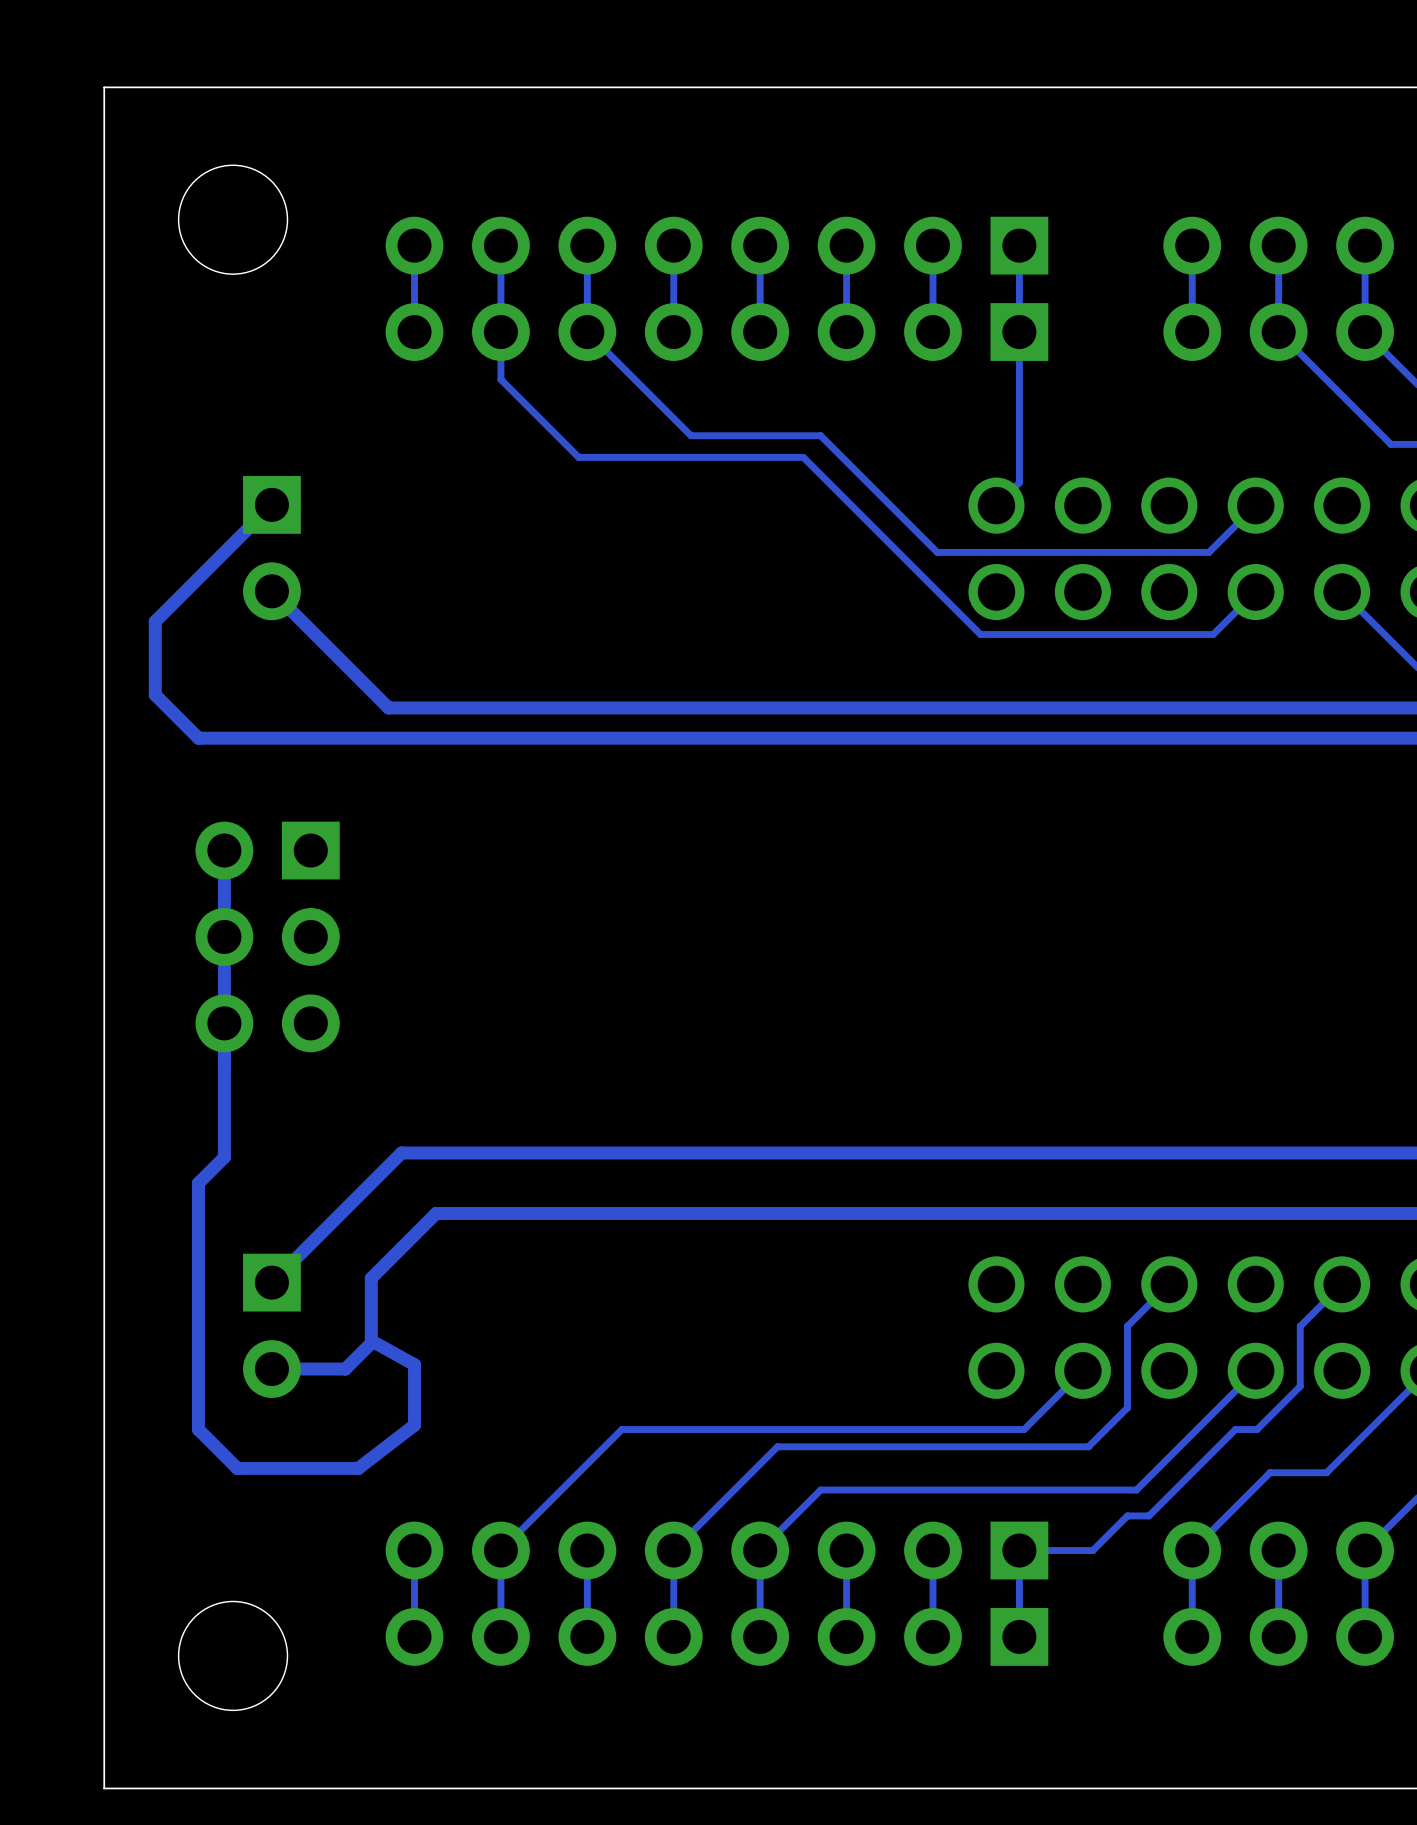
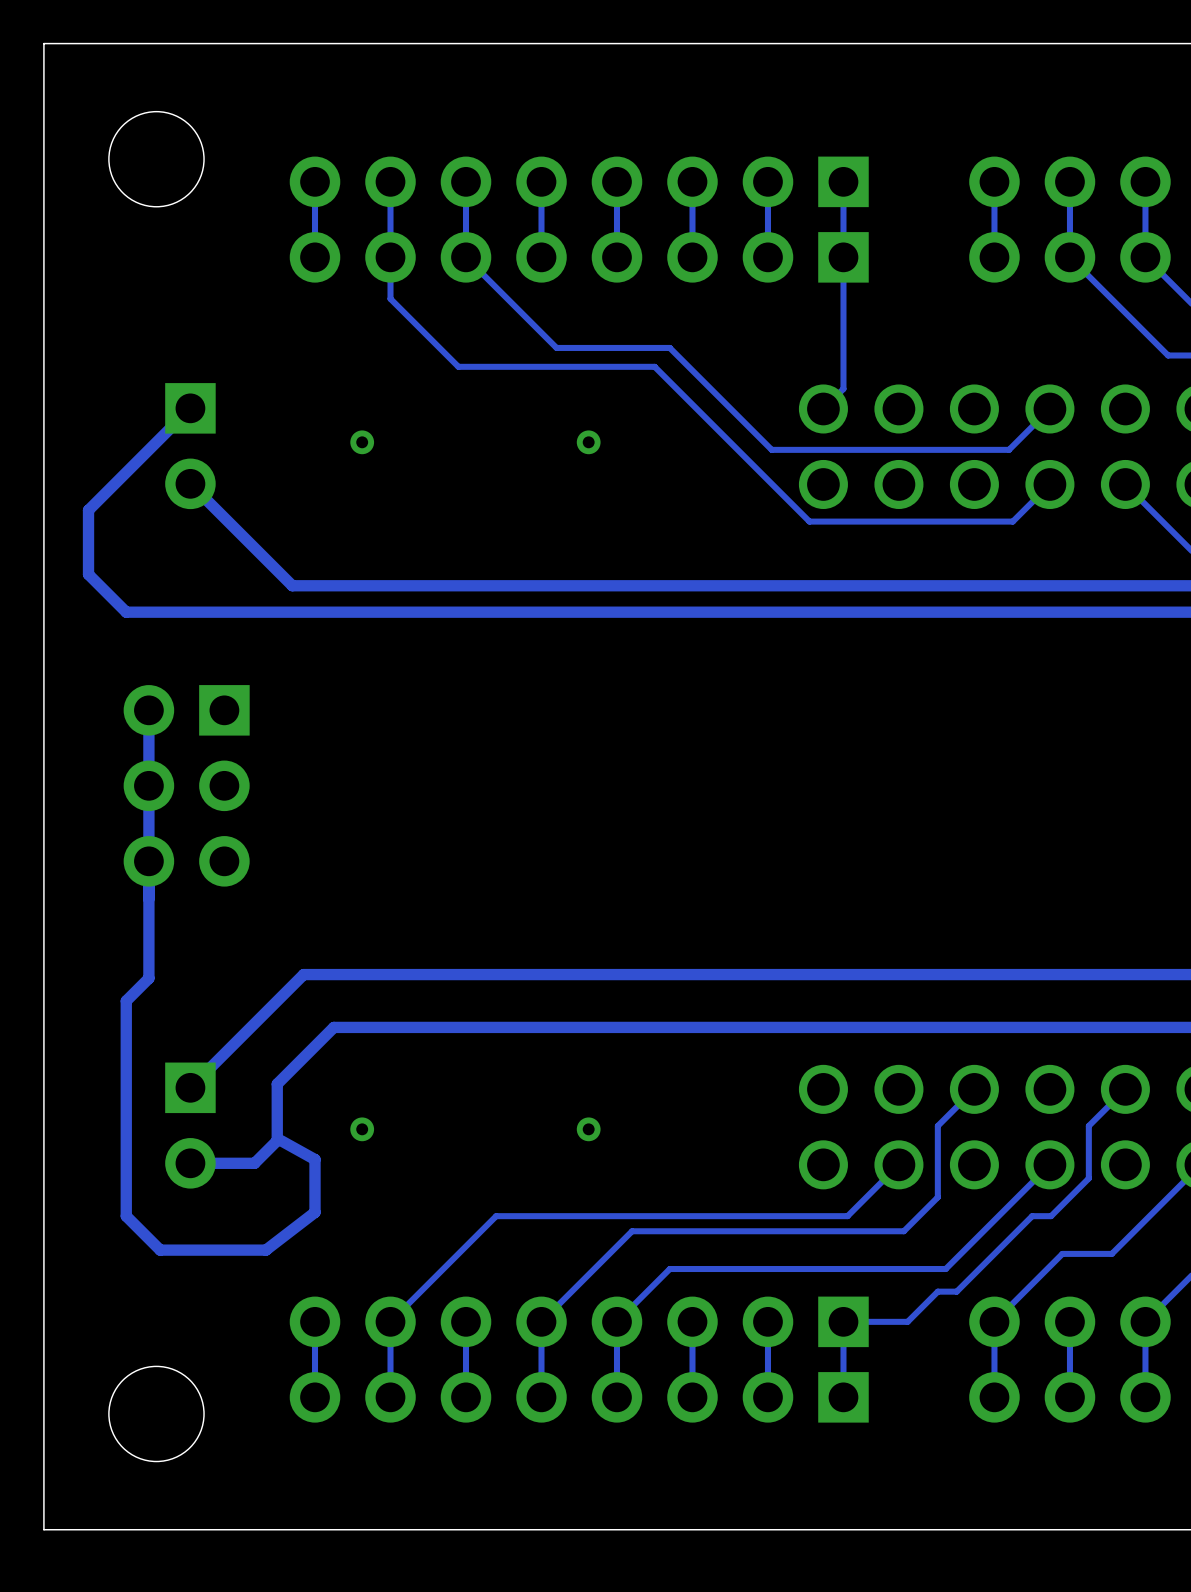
via: none -> (362, 442)
via: none -> (588, 442)
via: none -> (362, 1129)
via: none -> (588, 1129)

